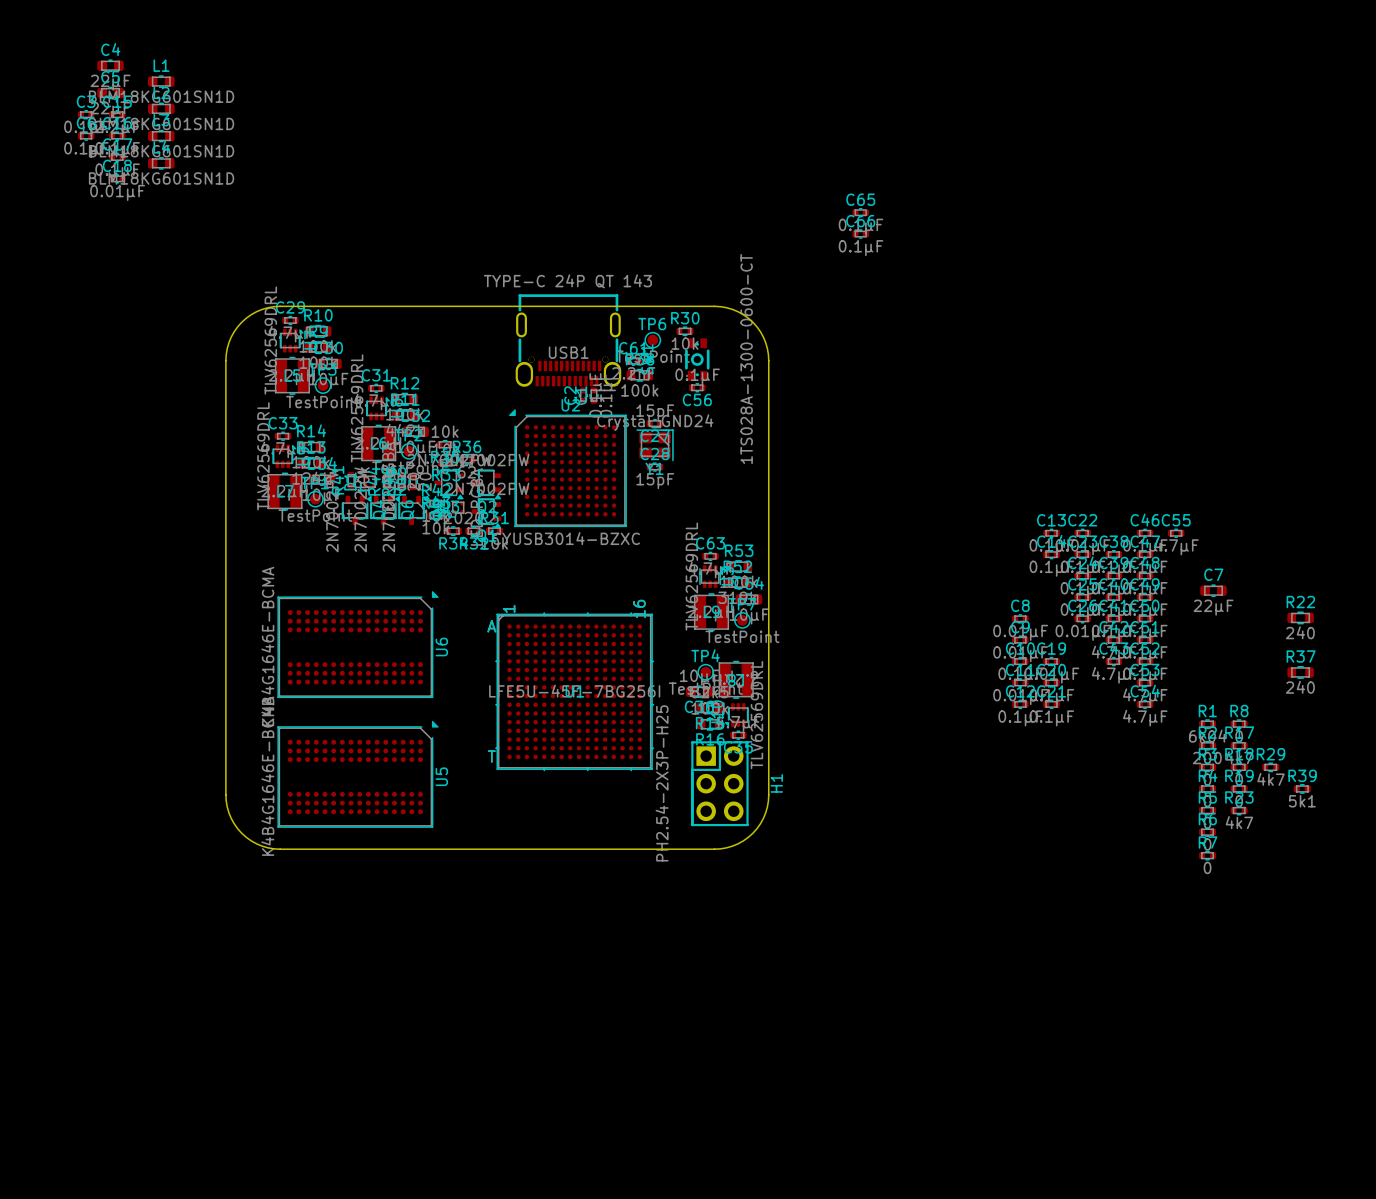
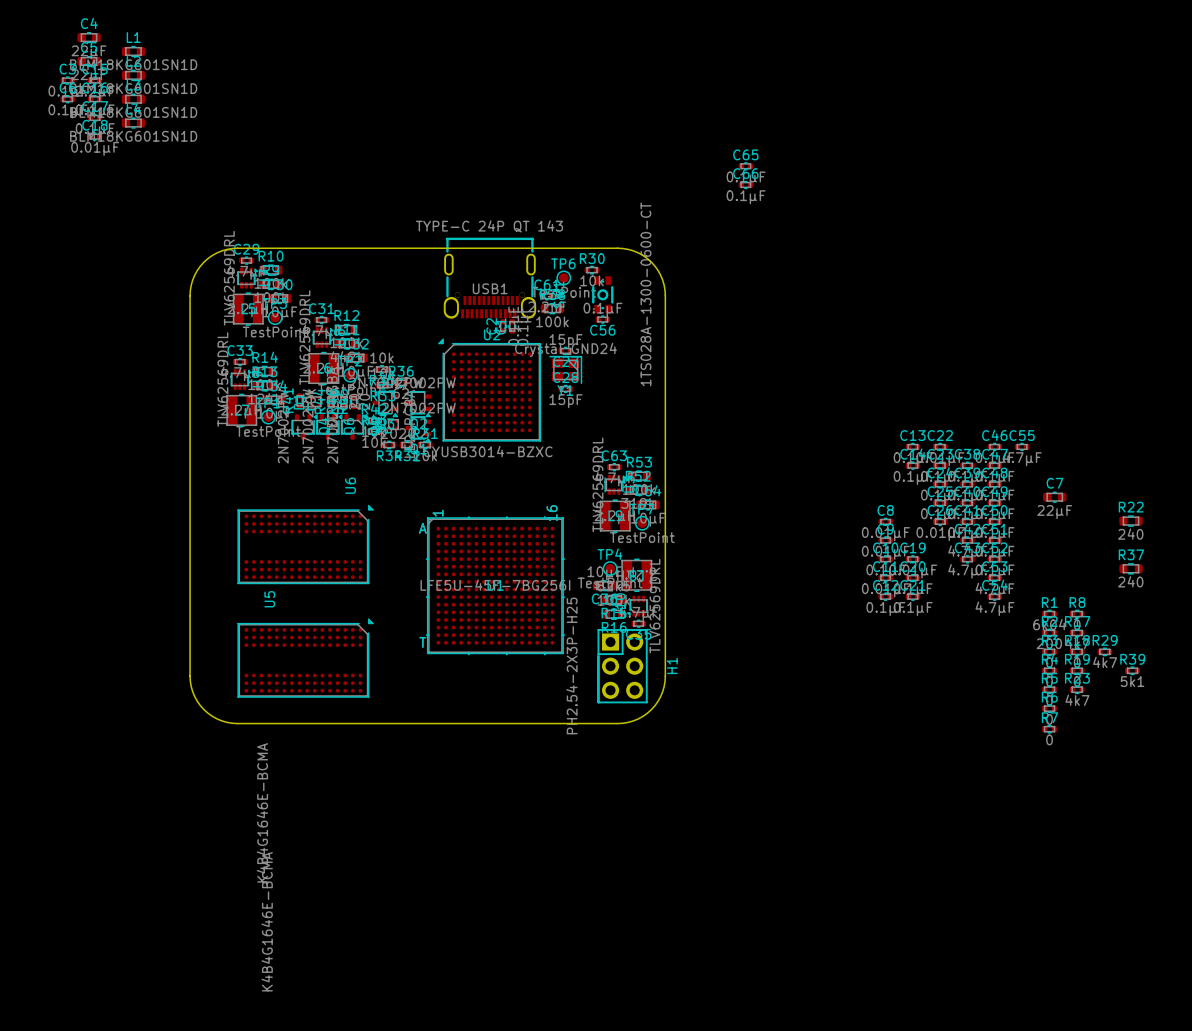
U6 footprint: [277, 591, 439, 698] -> [237, 504, 374, 585]
U6 value position: K4B4G1646E-BCMA (267, 646) -> K4B4G1646E-BCMA (262, 812)
U6 name position: U6 (441, 647) -> U6 (350, 485)
U5 footprint: [277, 720, 439, 828] -> [237, 618, 374, 698]
U5 value position: K4B4G1646E-BCMA (267, 776) -> K4B4G1646E-BCMA (267, 921)
U5 name position: U5 (441, 776) -> U5 (269, 599)

